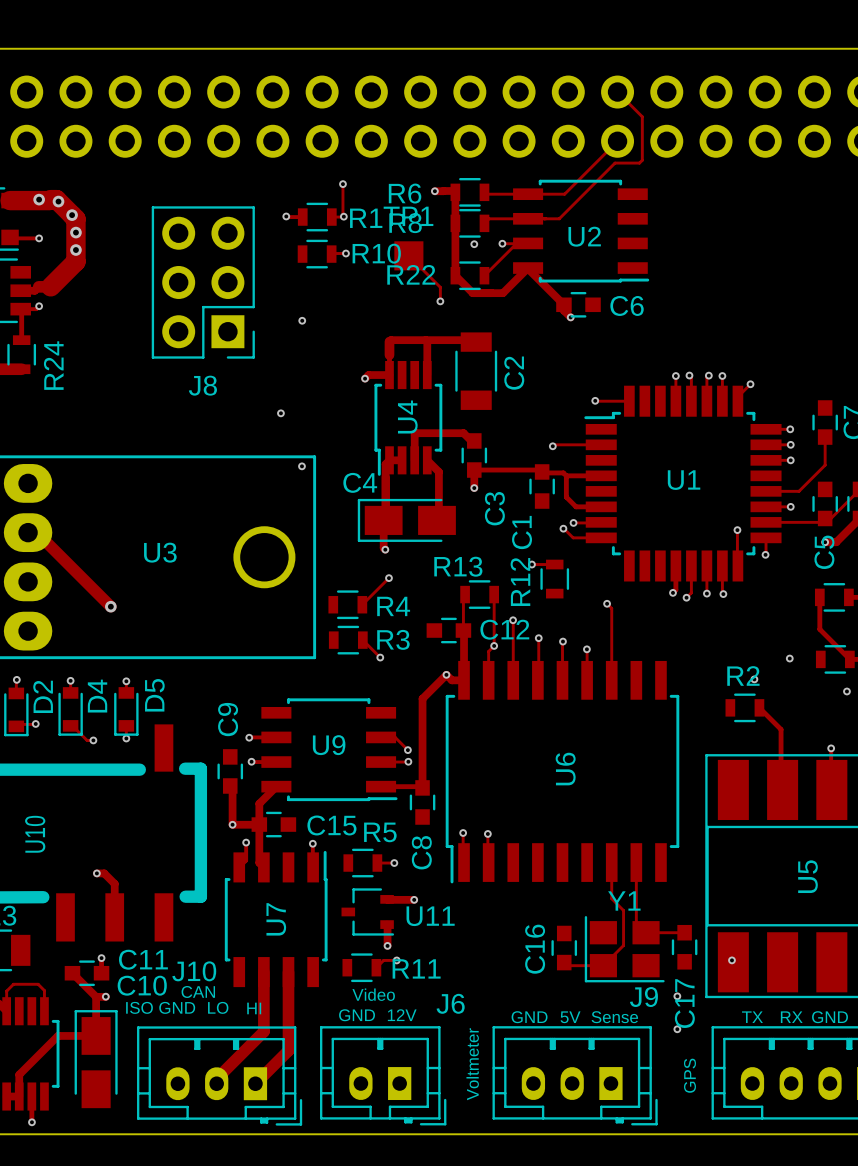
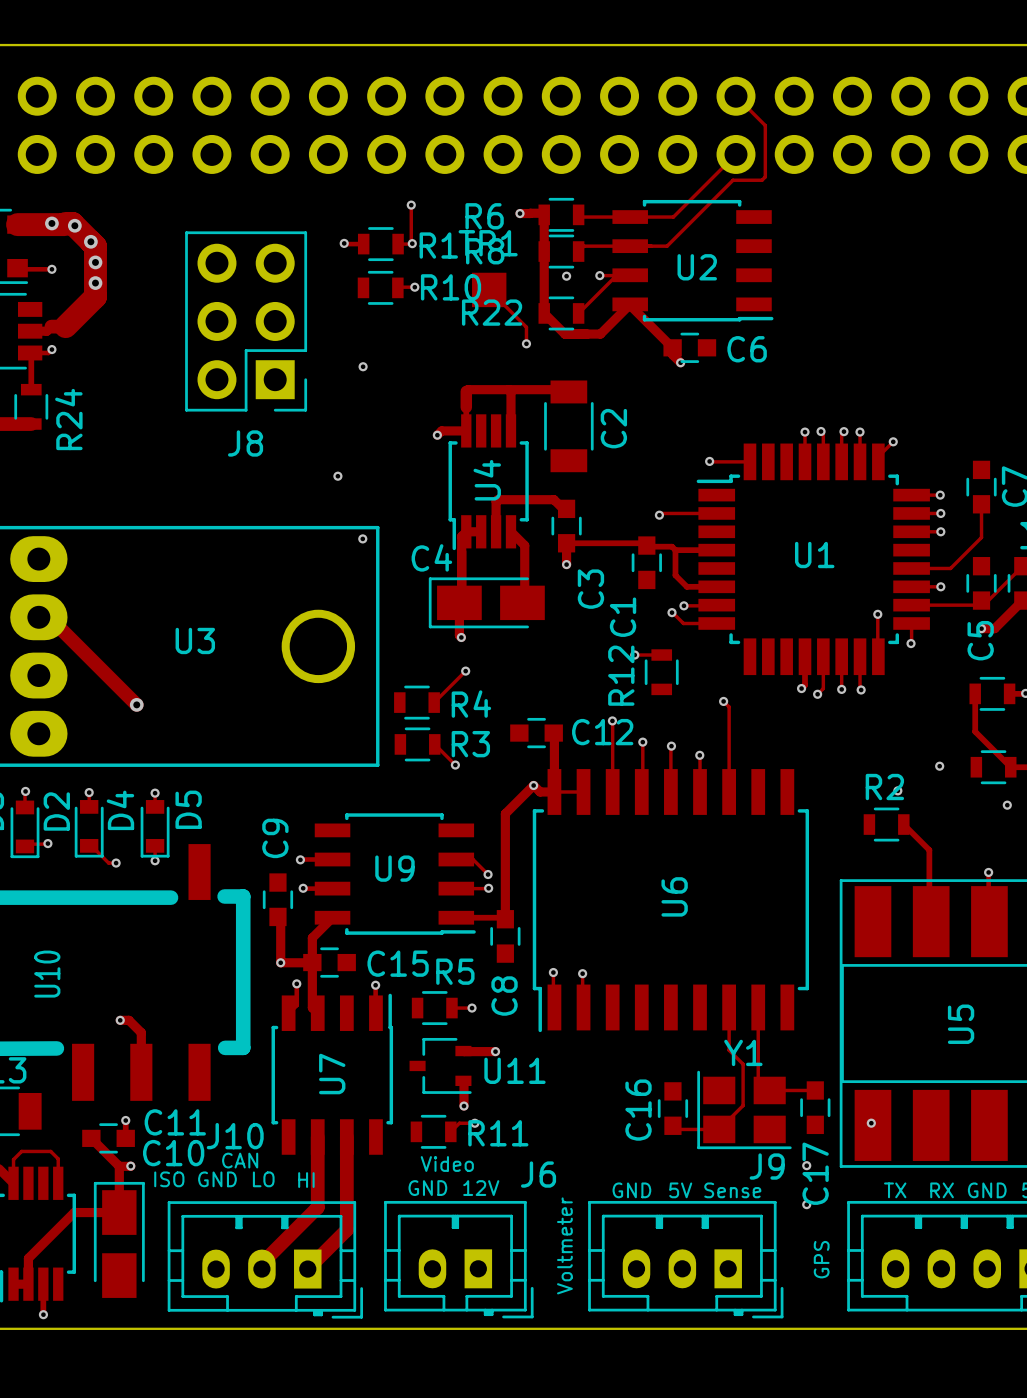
track: (465, 594) (463, 596) (463, 630) -> none
R13: (479, 594) -> none
track: (494, 594) (494, 645) (488, 651) (488, 680) -> (554, 791) (583, 791)
via: (494, 645) -> none

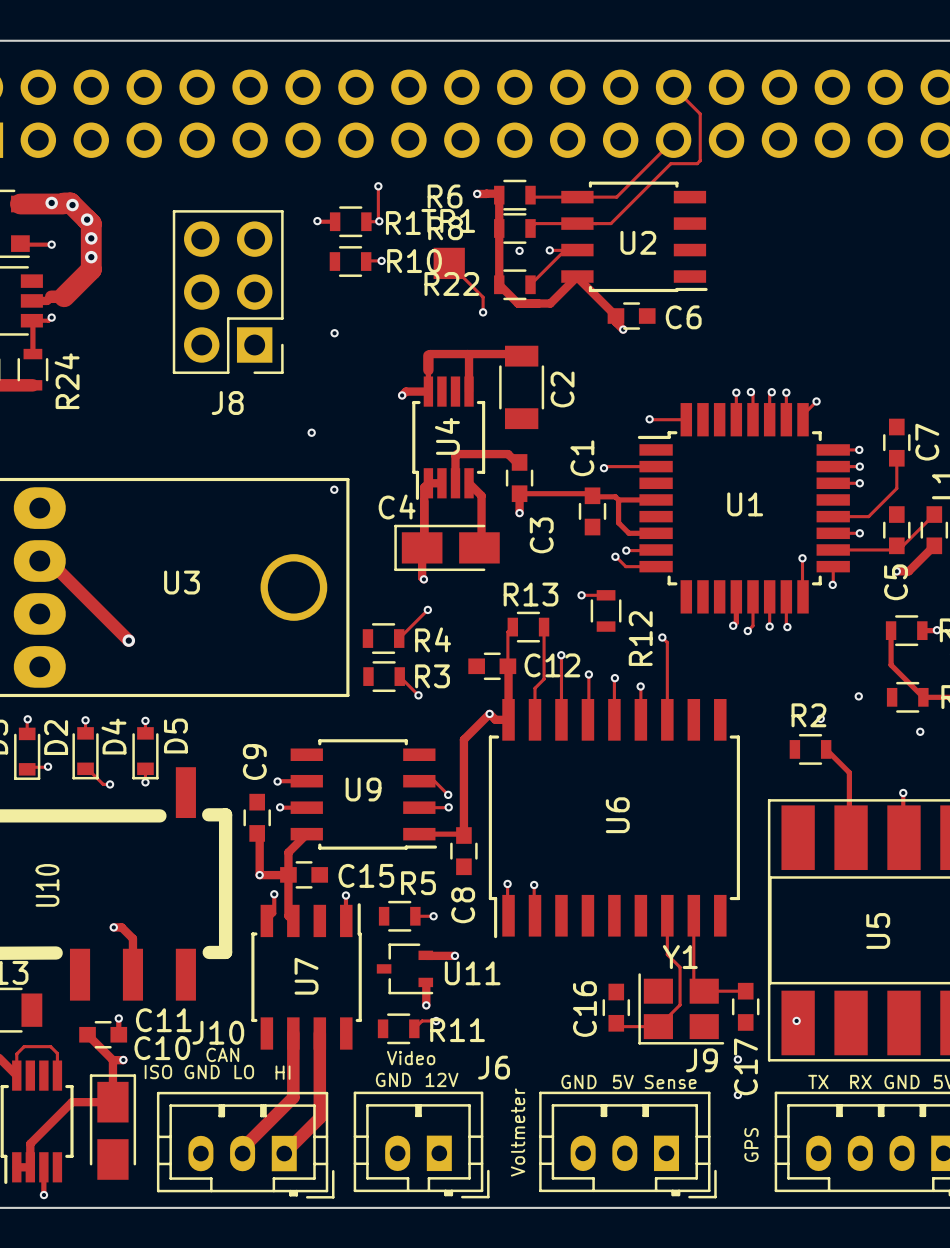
C1 name position: C1 (623, 617) -> C1 (582, 458)
R12 name position: R12 (621, 675) -> R12 (640, 638)
track: none -> (512, 627) (507, 631) (507, 666)
R13: none -> (528, 627)
track: (554, 791) (583, 791) -> (544, 627) (544, 679) (535, 688) (535, 719)

